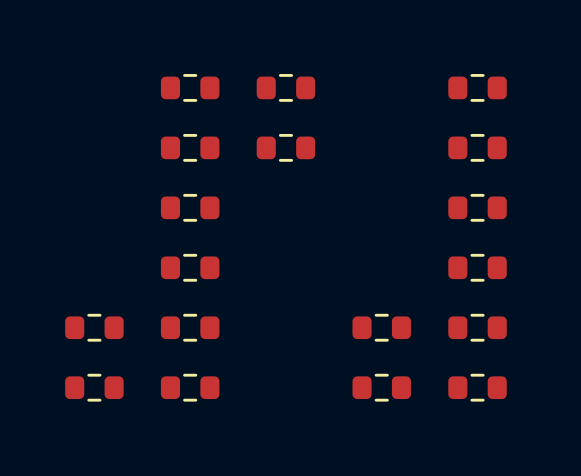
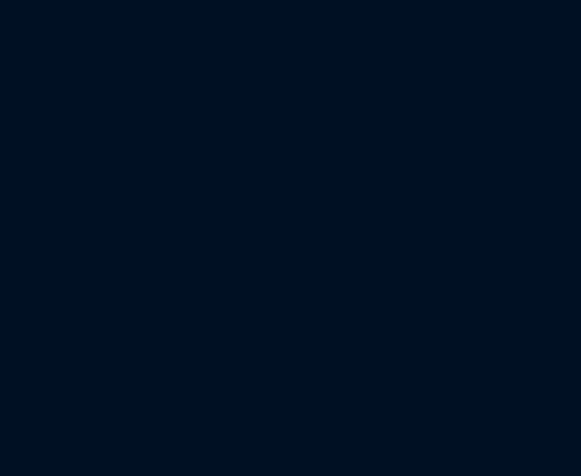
part: (190, 87) -> none
part: (285, 87) -> none
part: (477, 87) -> none
part: (190, 147) -> none
part: (285, 147) -> none
part: (477, 147) -> none
part: (190, 207) -> none
part: (477, 207) -> none
part: (190, 267) -> none
part: (477, 267) -> none
part: (94, 327) -> none
part: (190, 327) -> none
part: (381, 327) -> none
part: (477, 327) -> none
part: (94, 387) -> none
part: (190, 387) -> none
part: (381, 387) -> none
part: (477, 387) -> none

